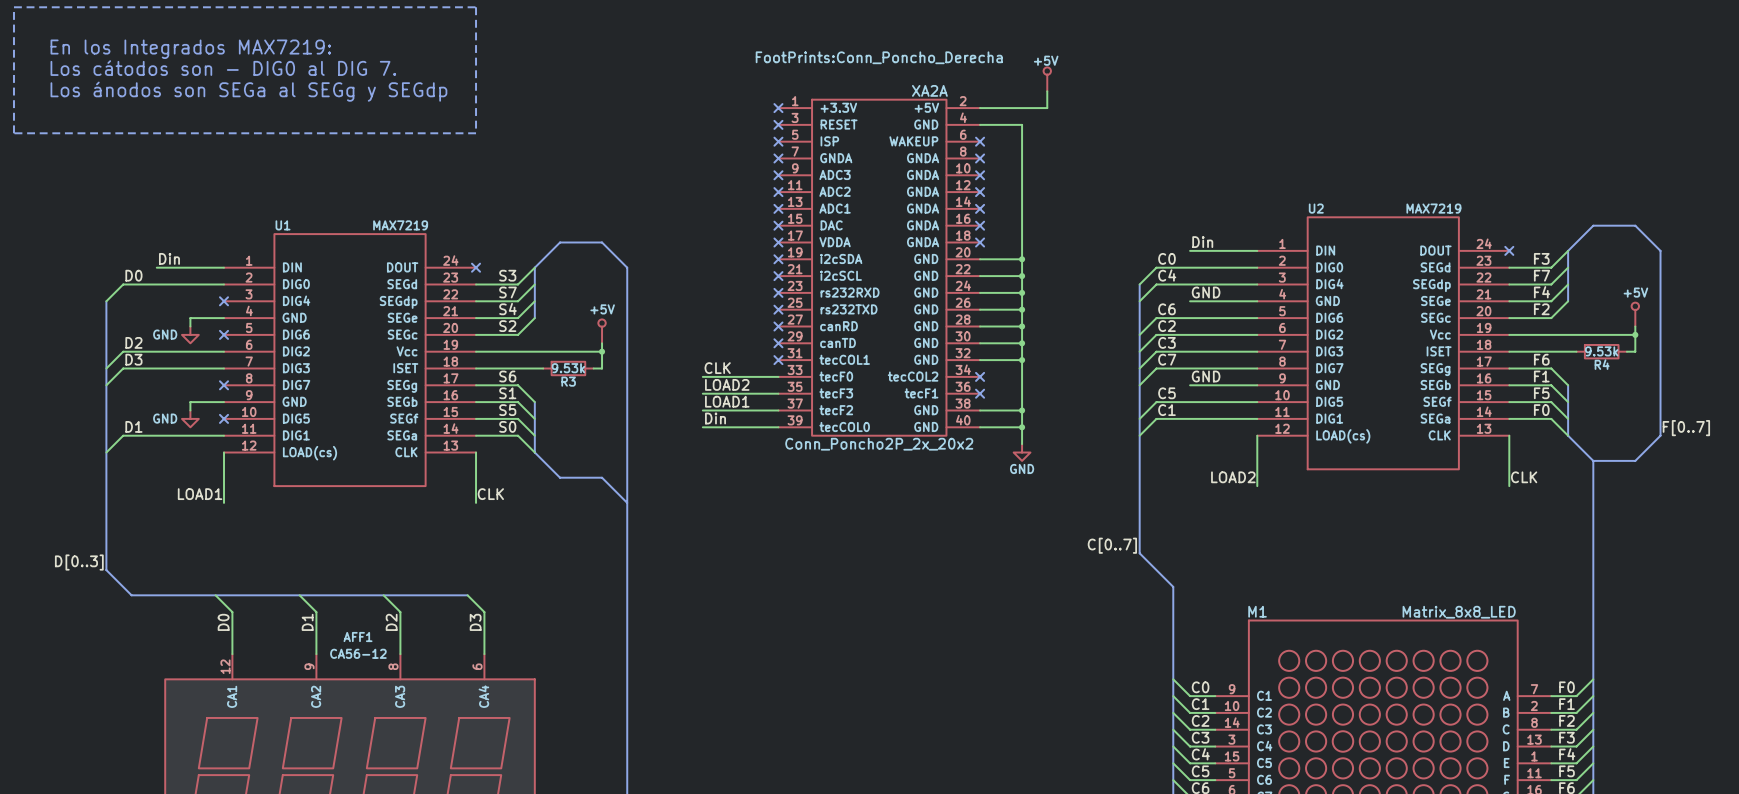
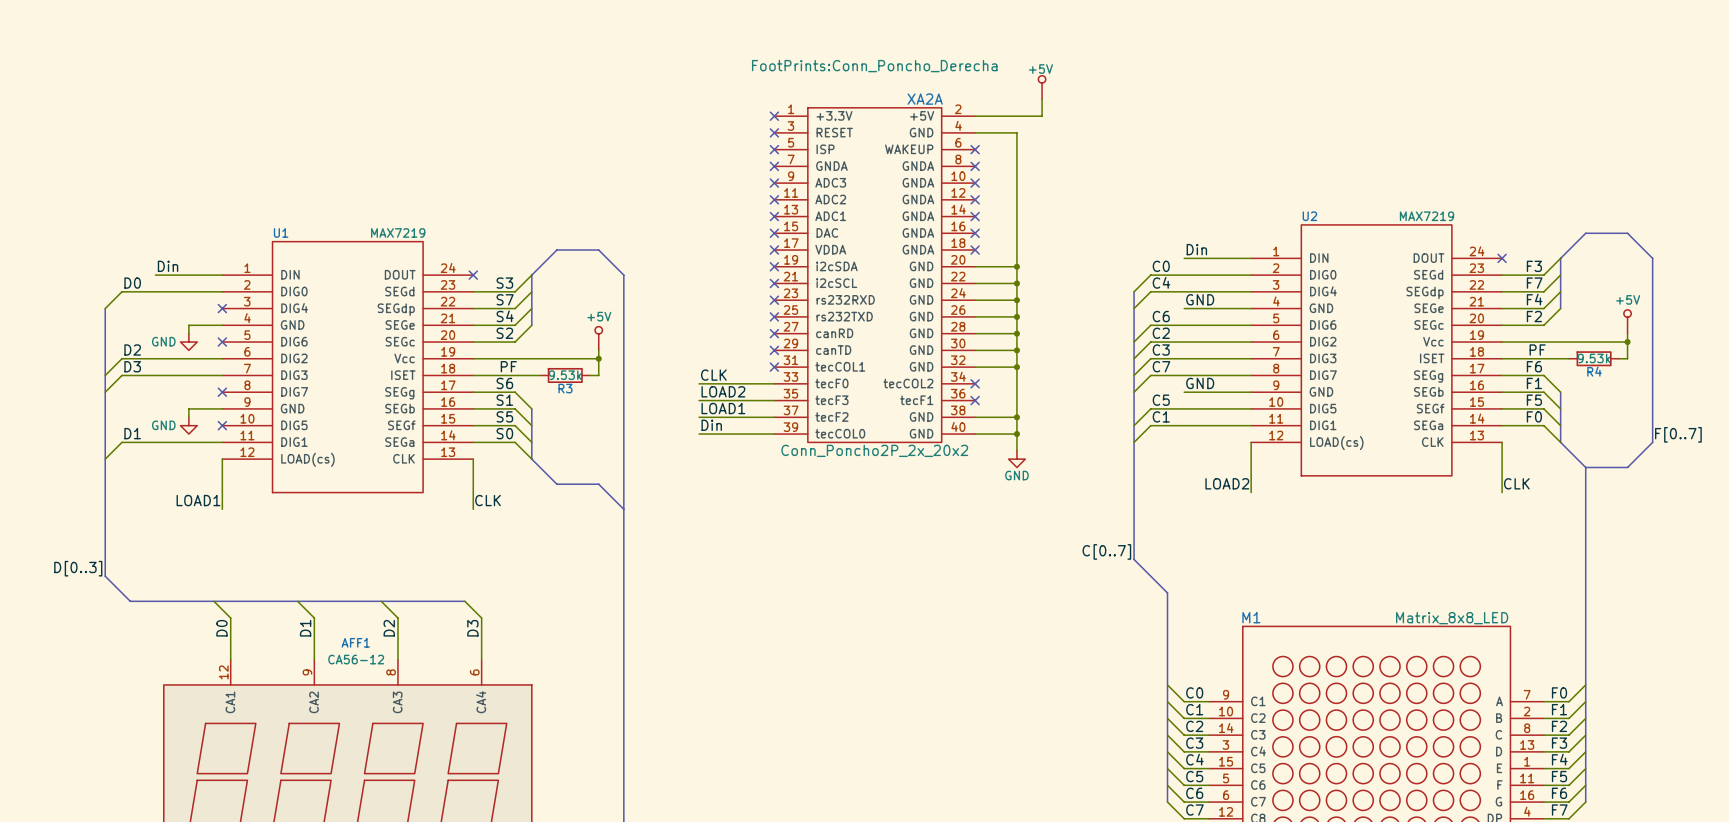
line: (13, 7) (476, 7) (476, 133) (13, 133) (13, 7) -> none
text: En los Integrados MAX7219: (190, 49) -> none
text: Los cátodos son - DIG0 al DIG 7. (223, 68) -> none
text: Los ánodos son SEGa al SEGg y SEGdp (248, 91) -> none
label: none -> PF (1537, 349)
label: none -> PF (508, 366)

